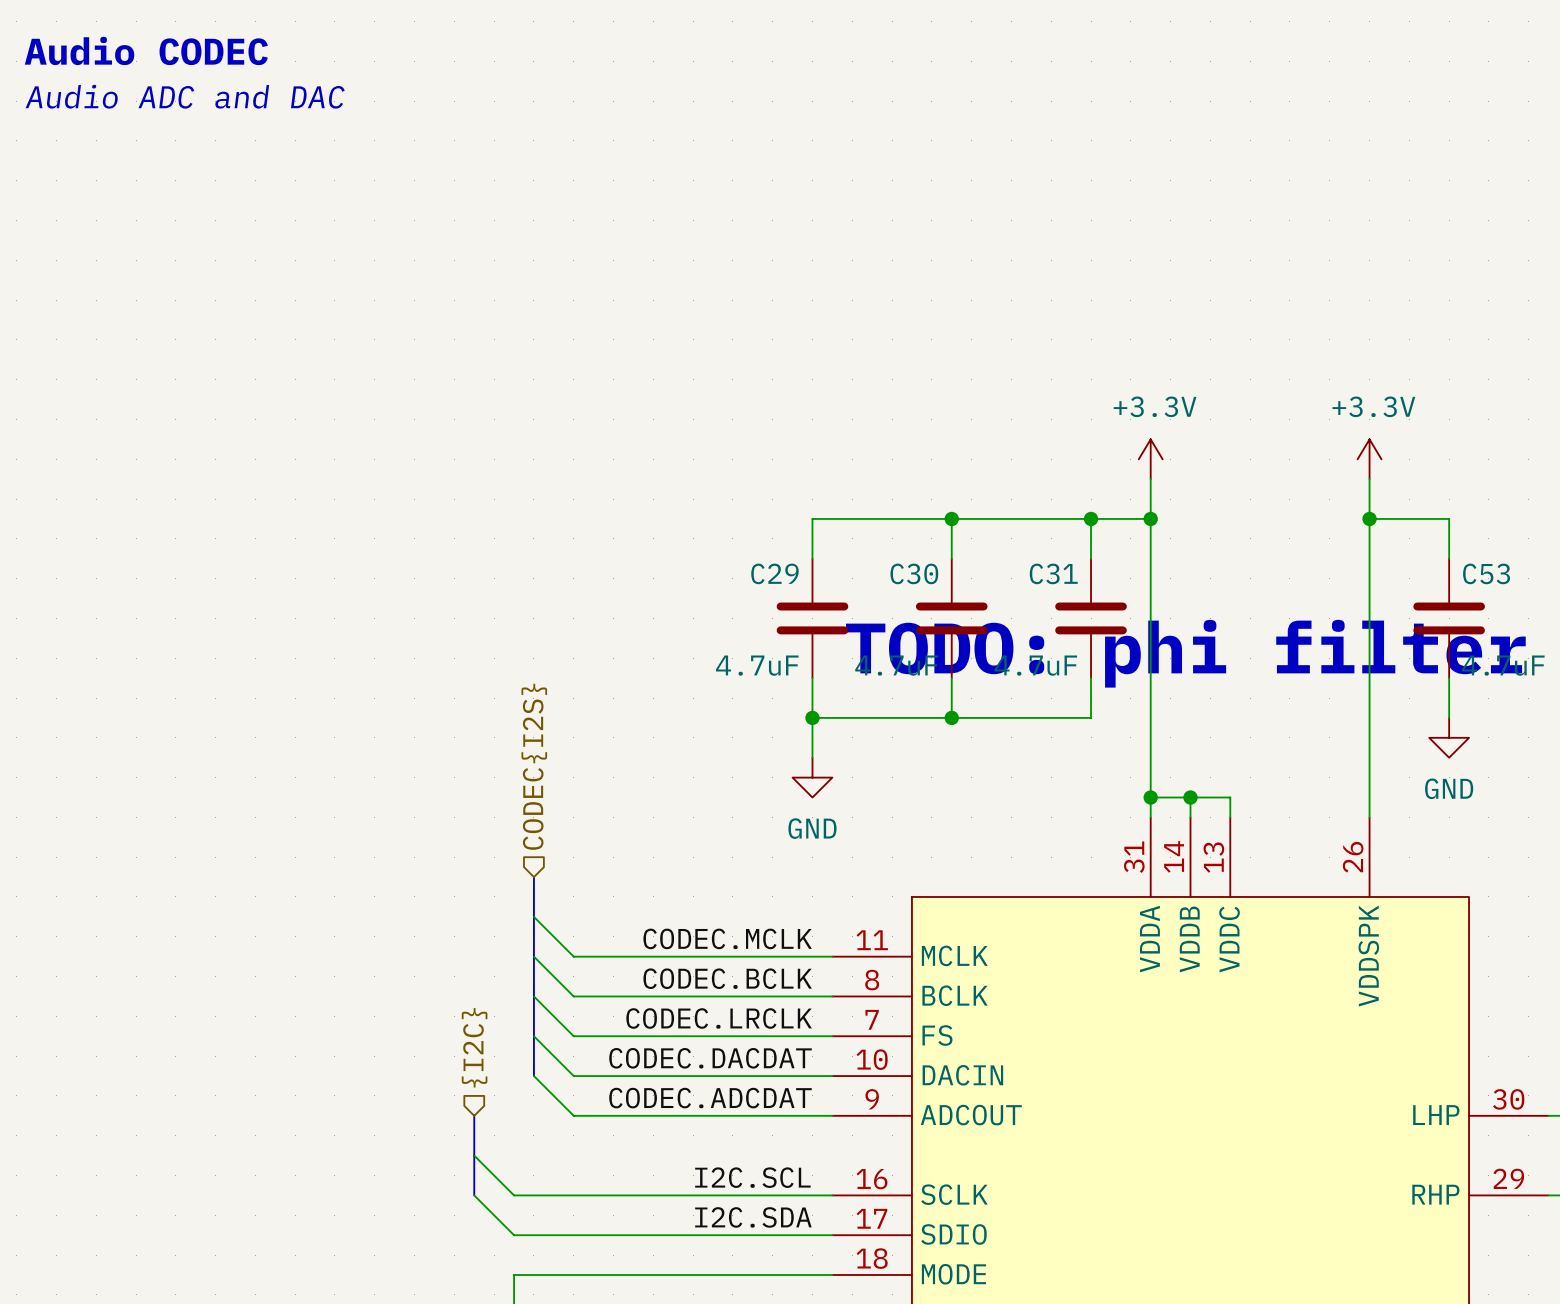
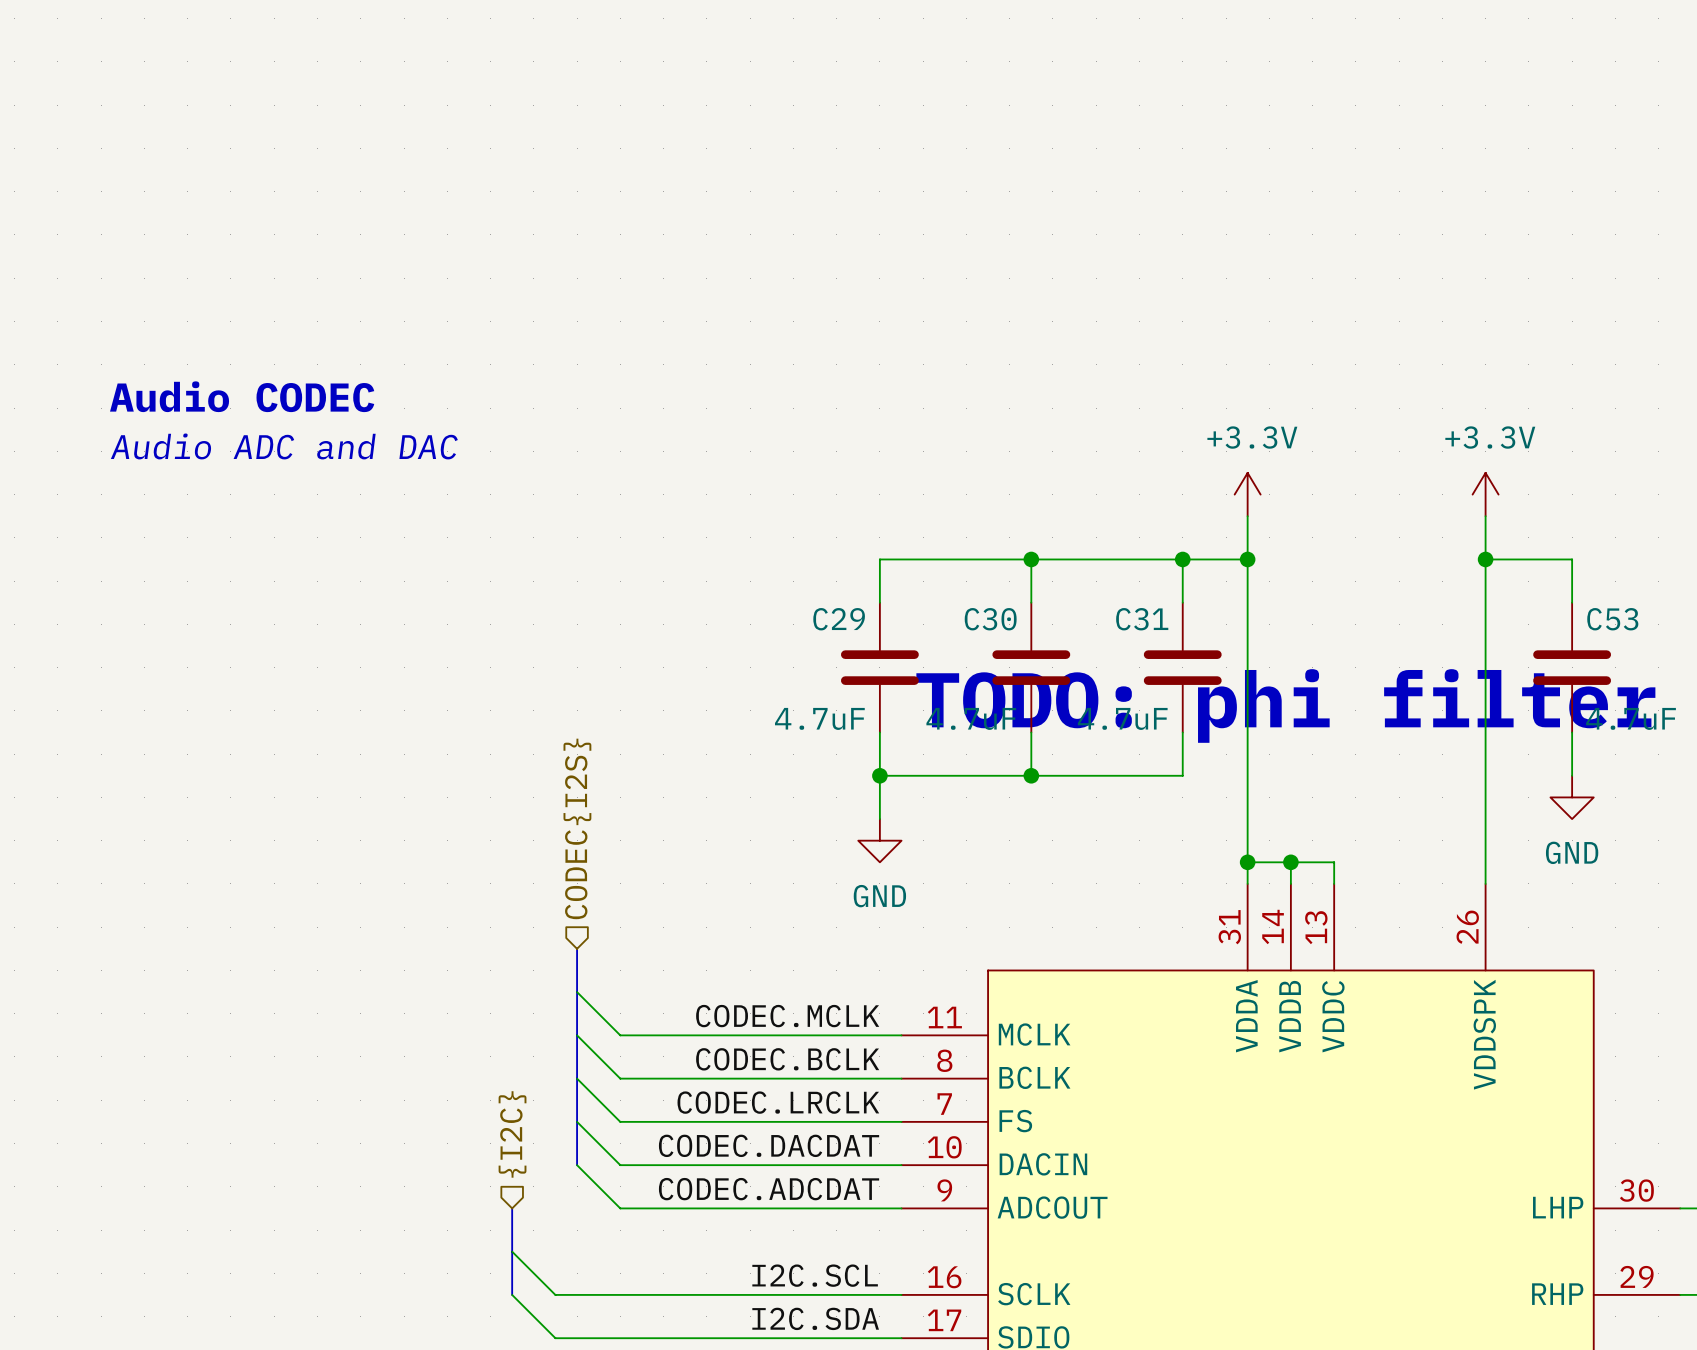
text position: Audio CODEC (146, 50) -> Audio CODEC (242, 396)
text position: Audio ADC and DAC (185, 96) -> Audio ADC and DAC (284, 446)

